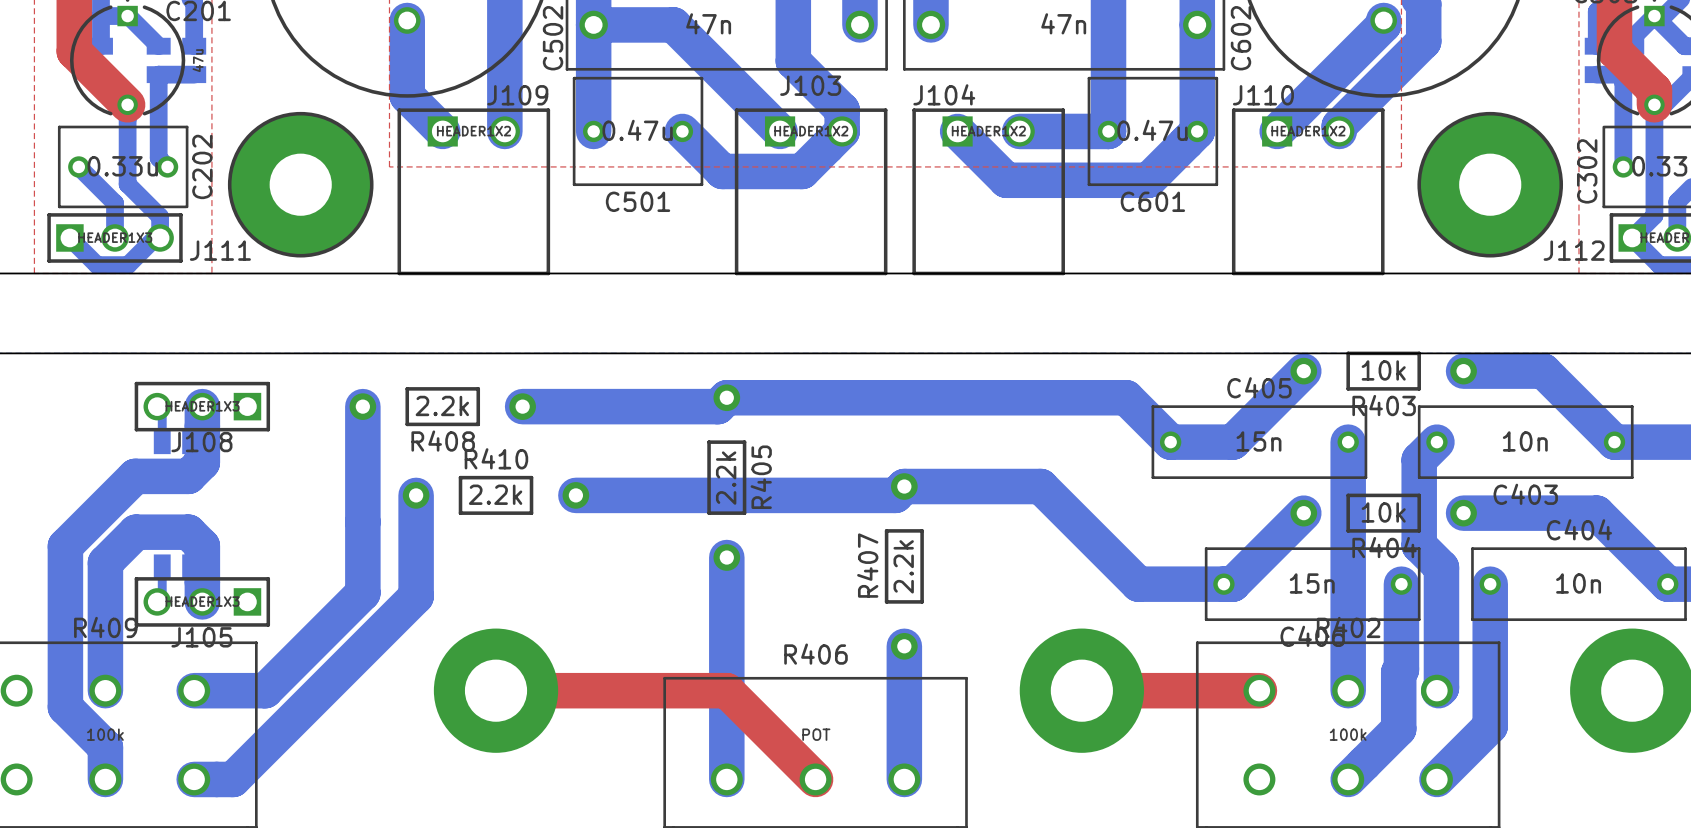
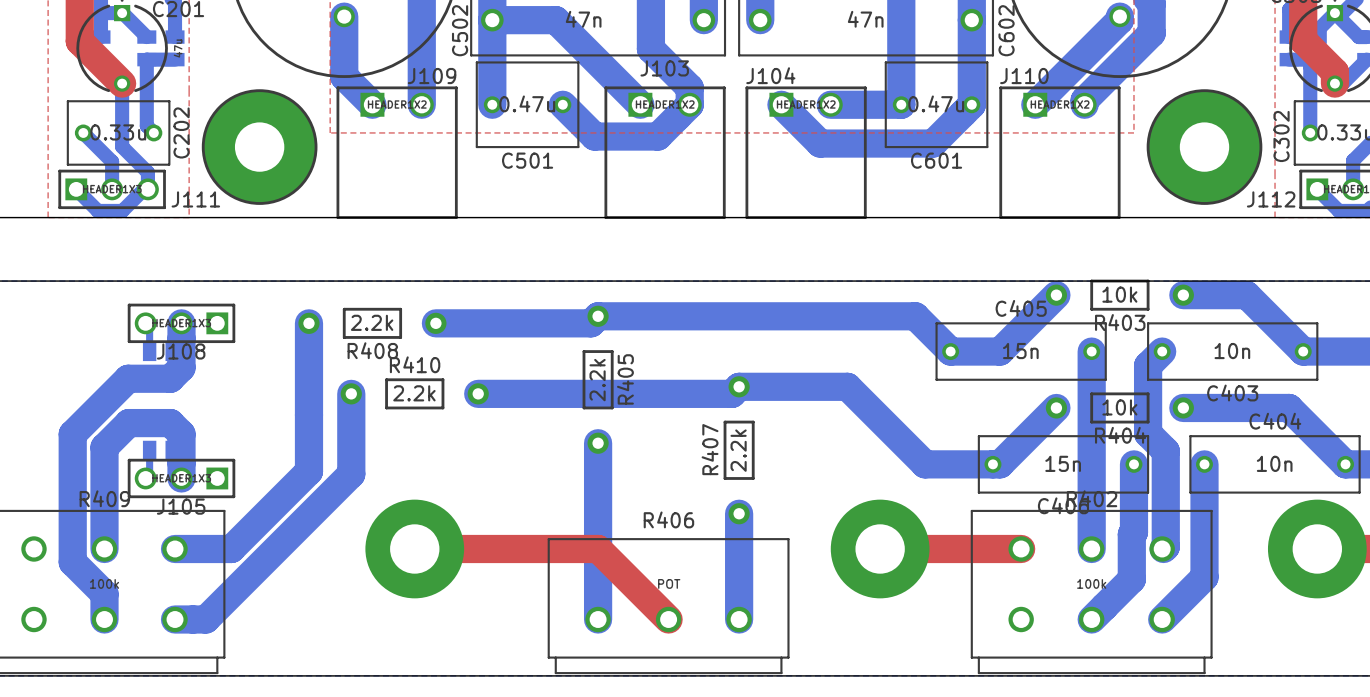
bottom track: (1654, 104) (1654, 215) (1632, 237) -> none

